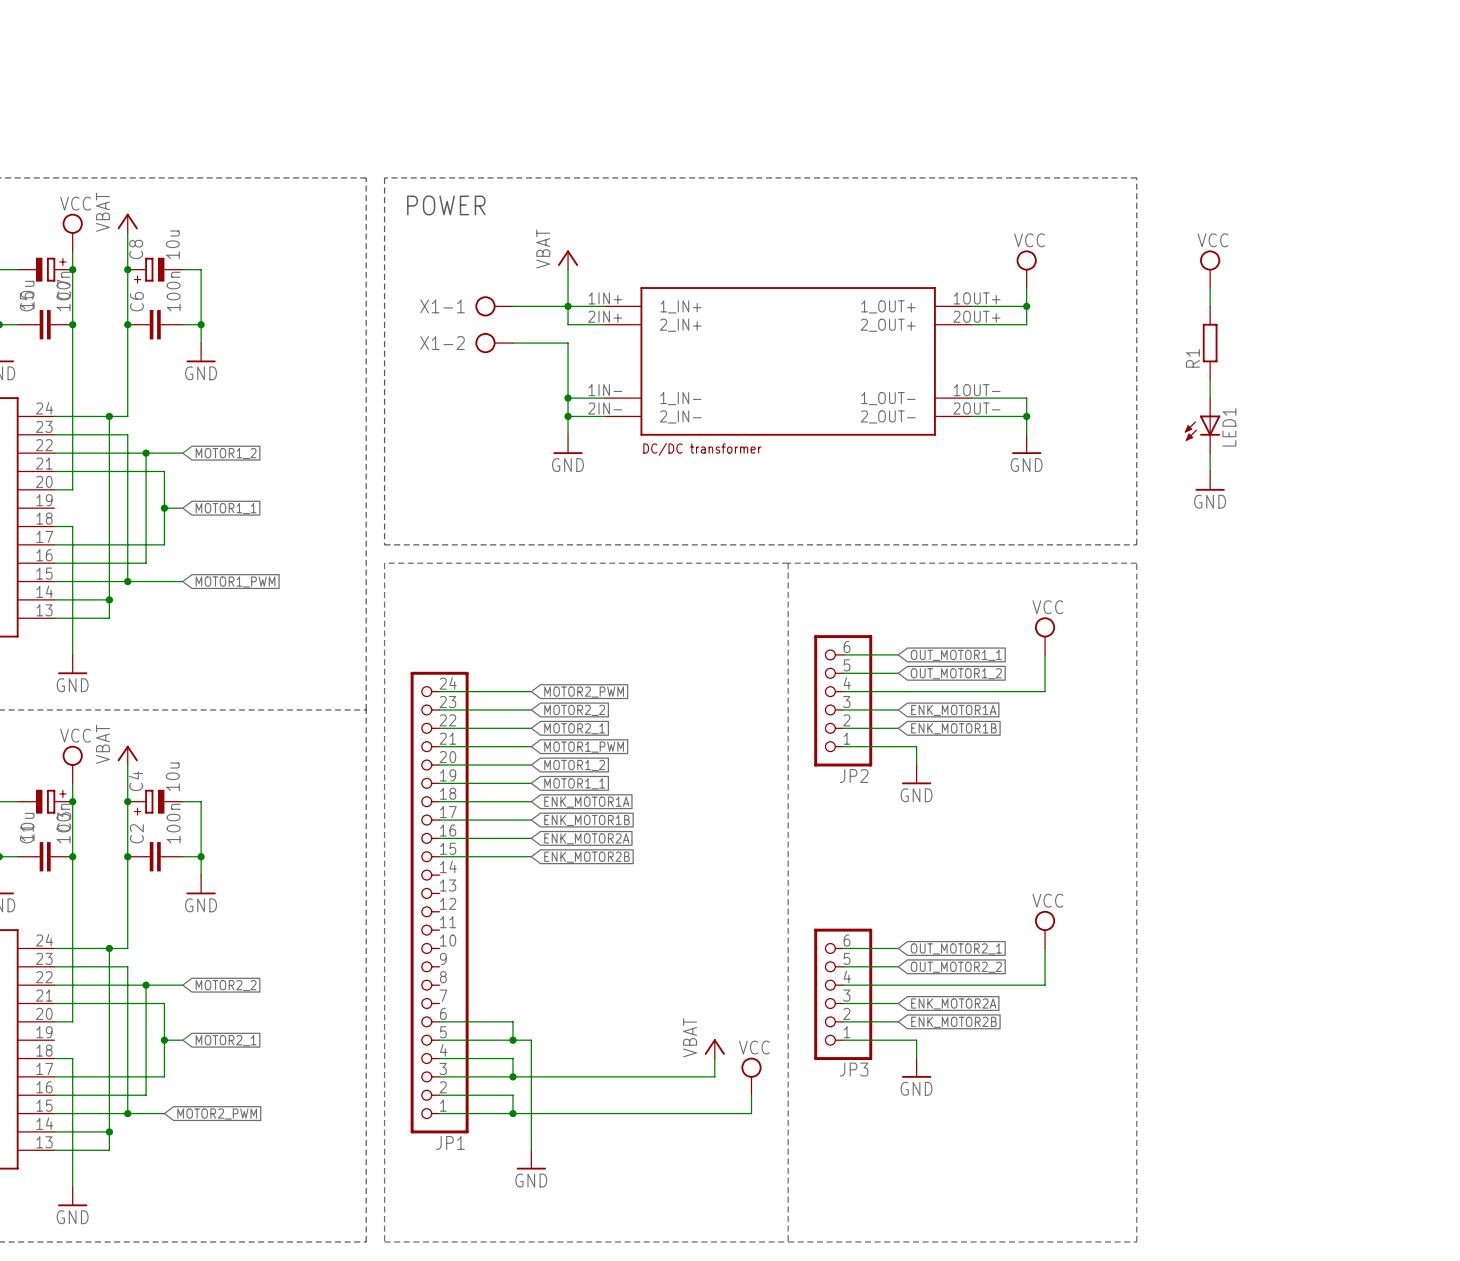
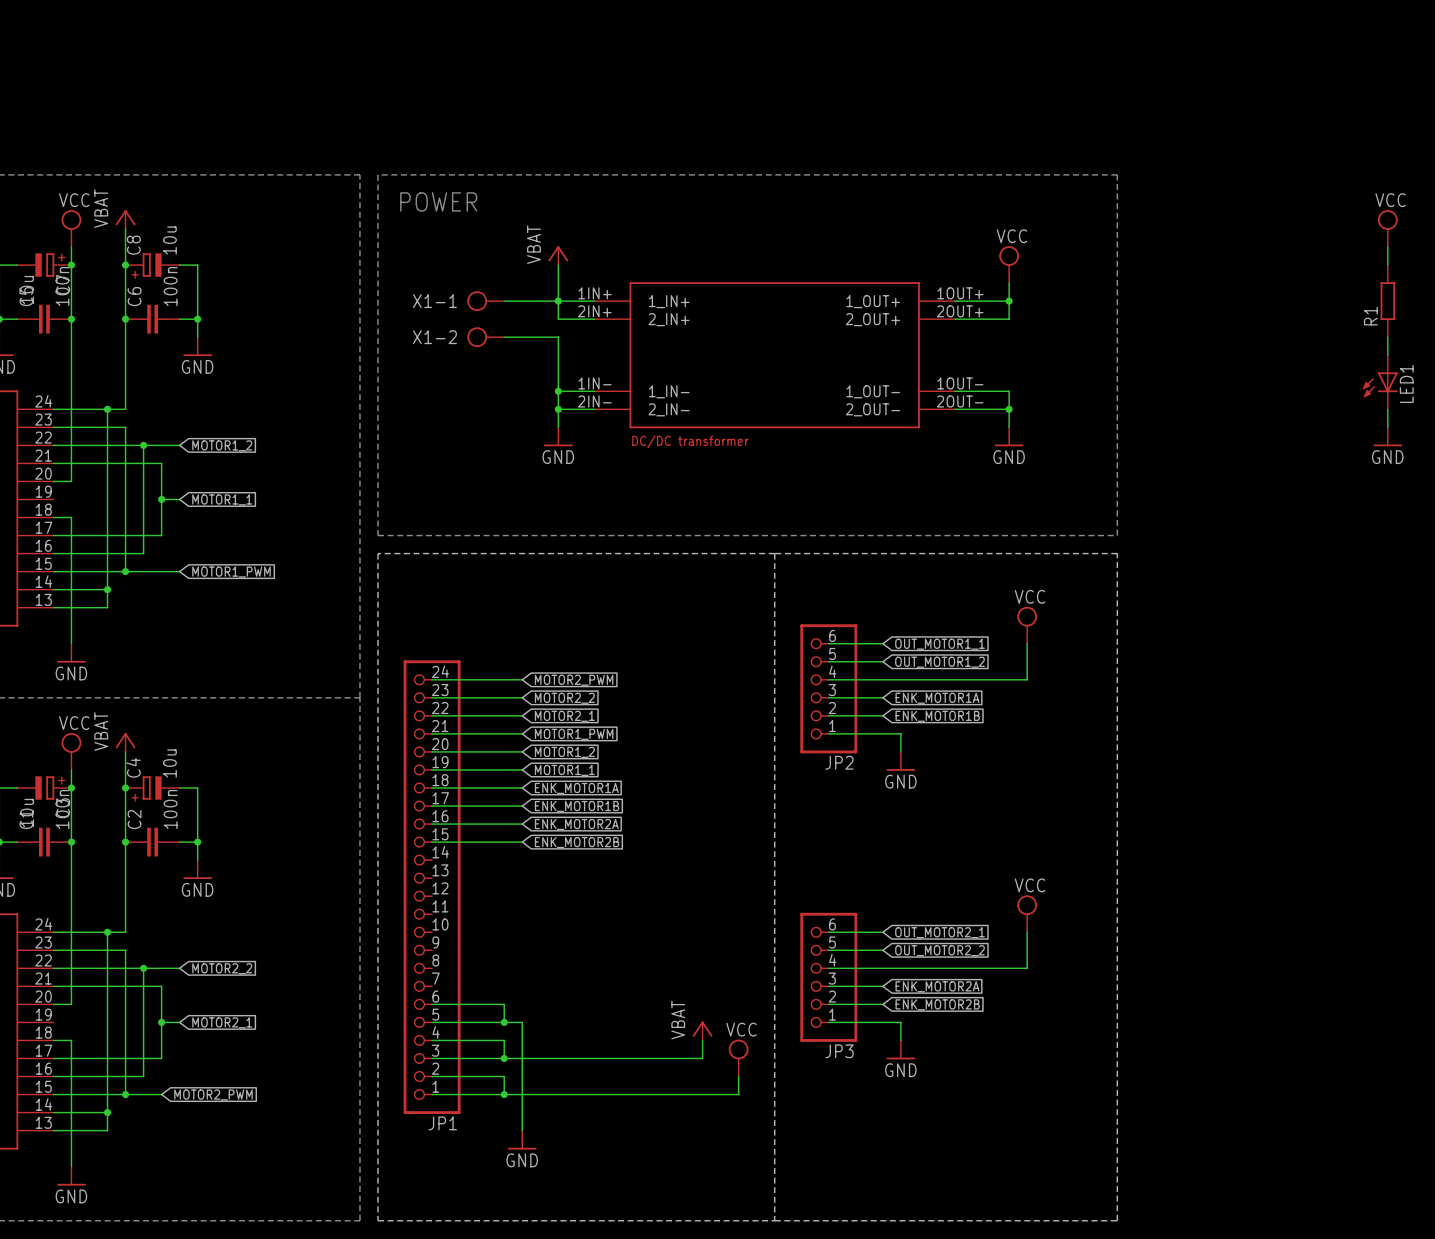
power symbol: none -> VCC (1387, 228)
wire: none -> (1387, 247) (1387, 265)
power symbol: VCC (1210, 269) -> none
wire: (1210, 288) (1210, 306) -> none
R1 position: (1210, 343) -> (1387, 301)
wire: none -> (1387, 337) (1387, 355)
wire: (1210, 379) (1210, 398) -> none
wire: none -> (1387, 409) (1387, 427)
LED1 position: (1202, 425) -> (1380, 382)
power symbol: none -> GND (1387, 436)
wire: (1210, 453) (1210, 471) -> none
power symbol: GND (1210, 481) -> none

